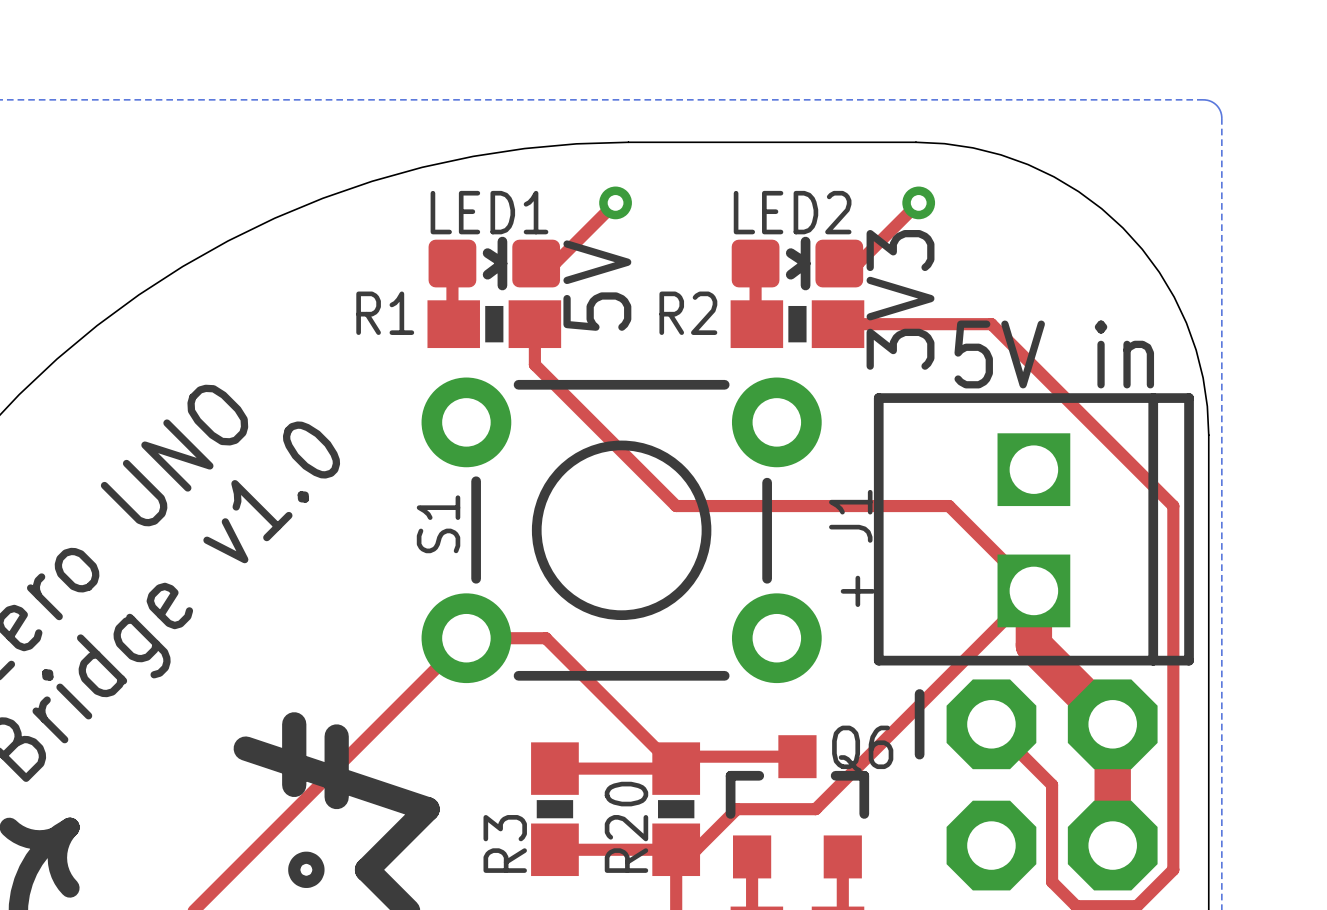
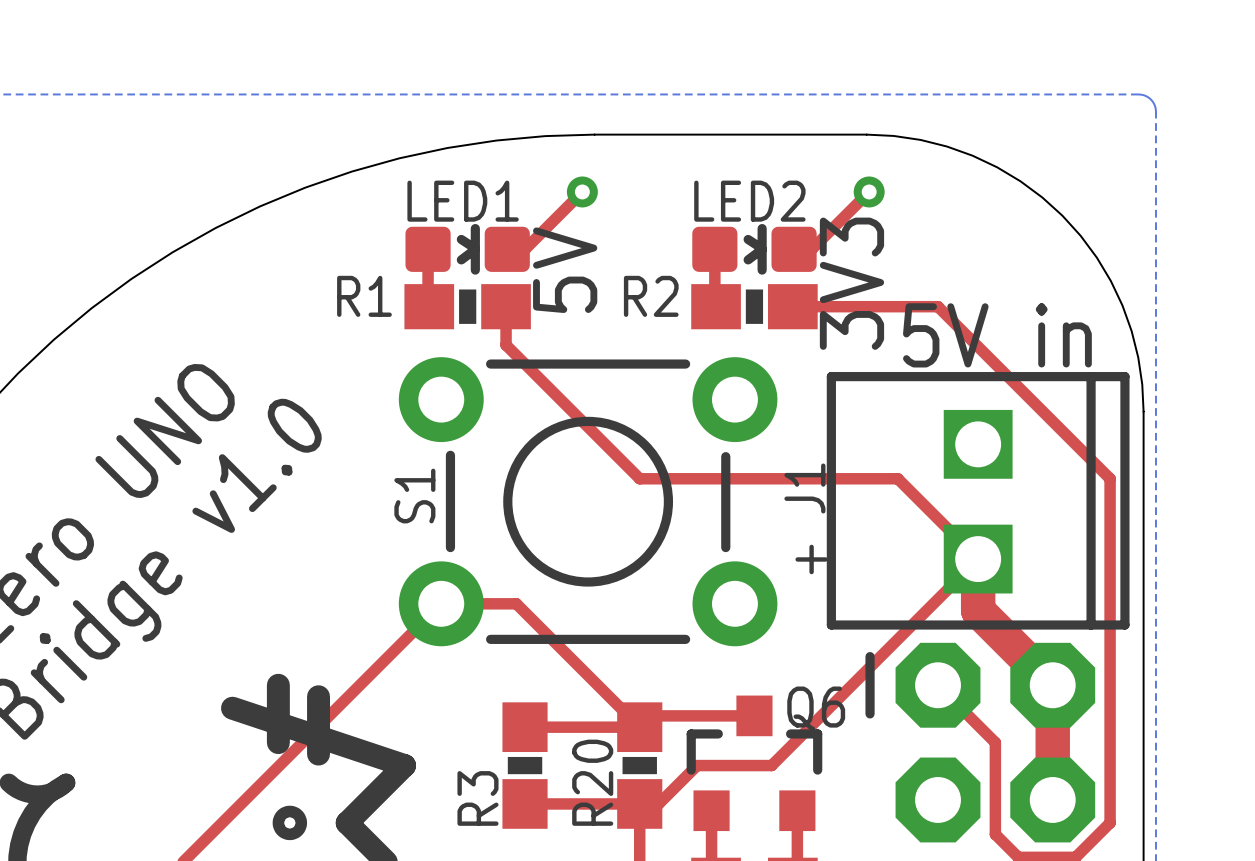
line: (69, 827) (60, 841) (57, 857) (60, 874) (69, 888) -> none

